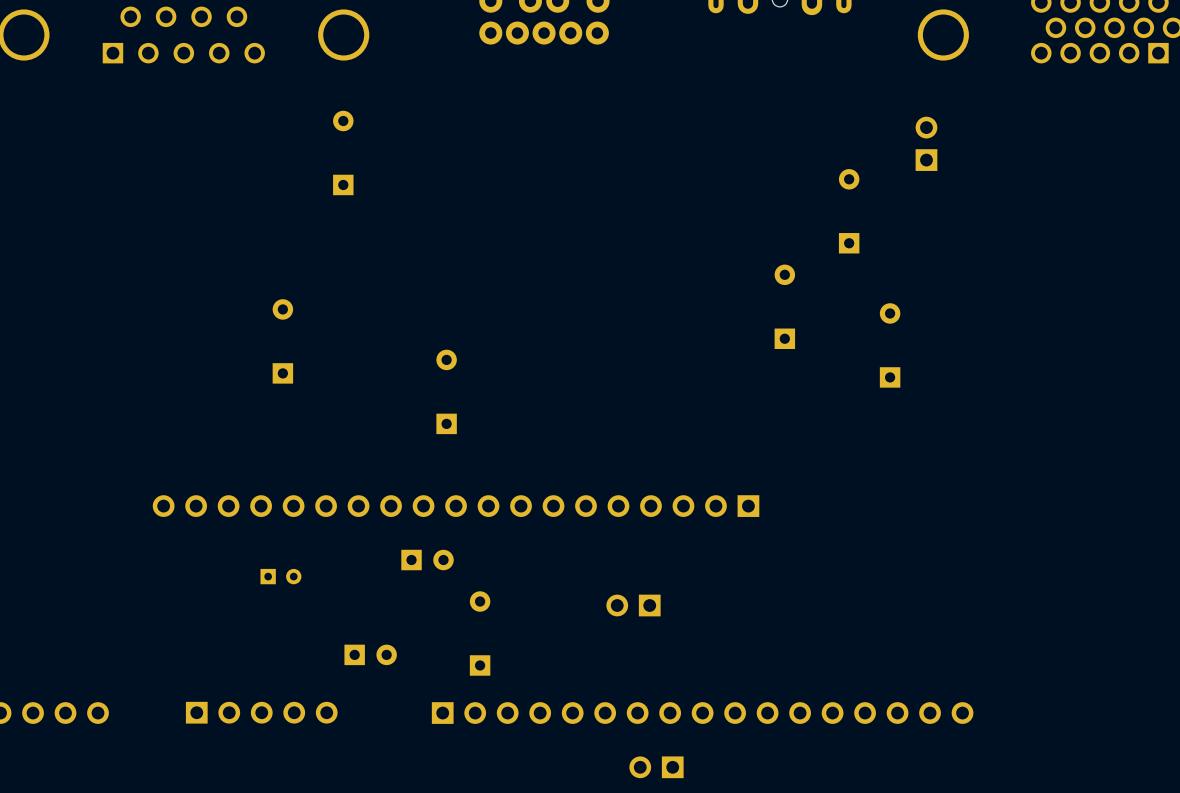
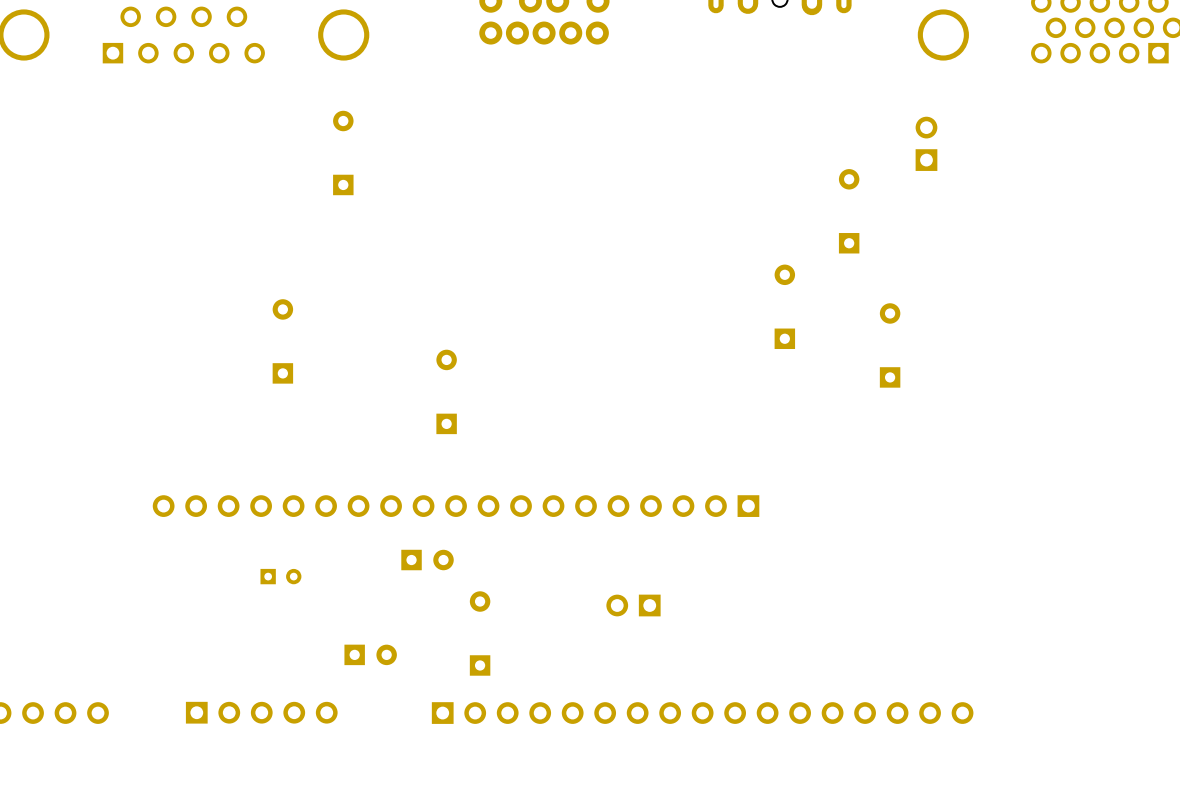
part: (656, 767) -> none

